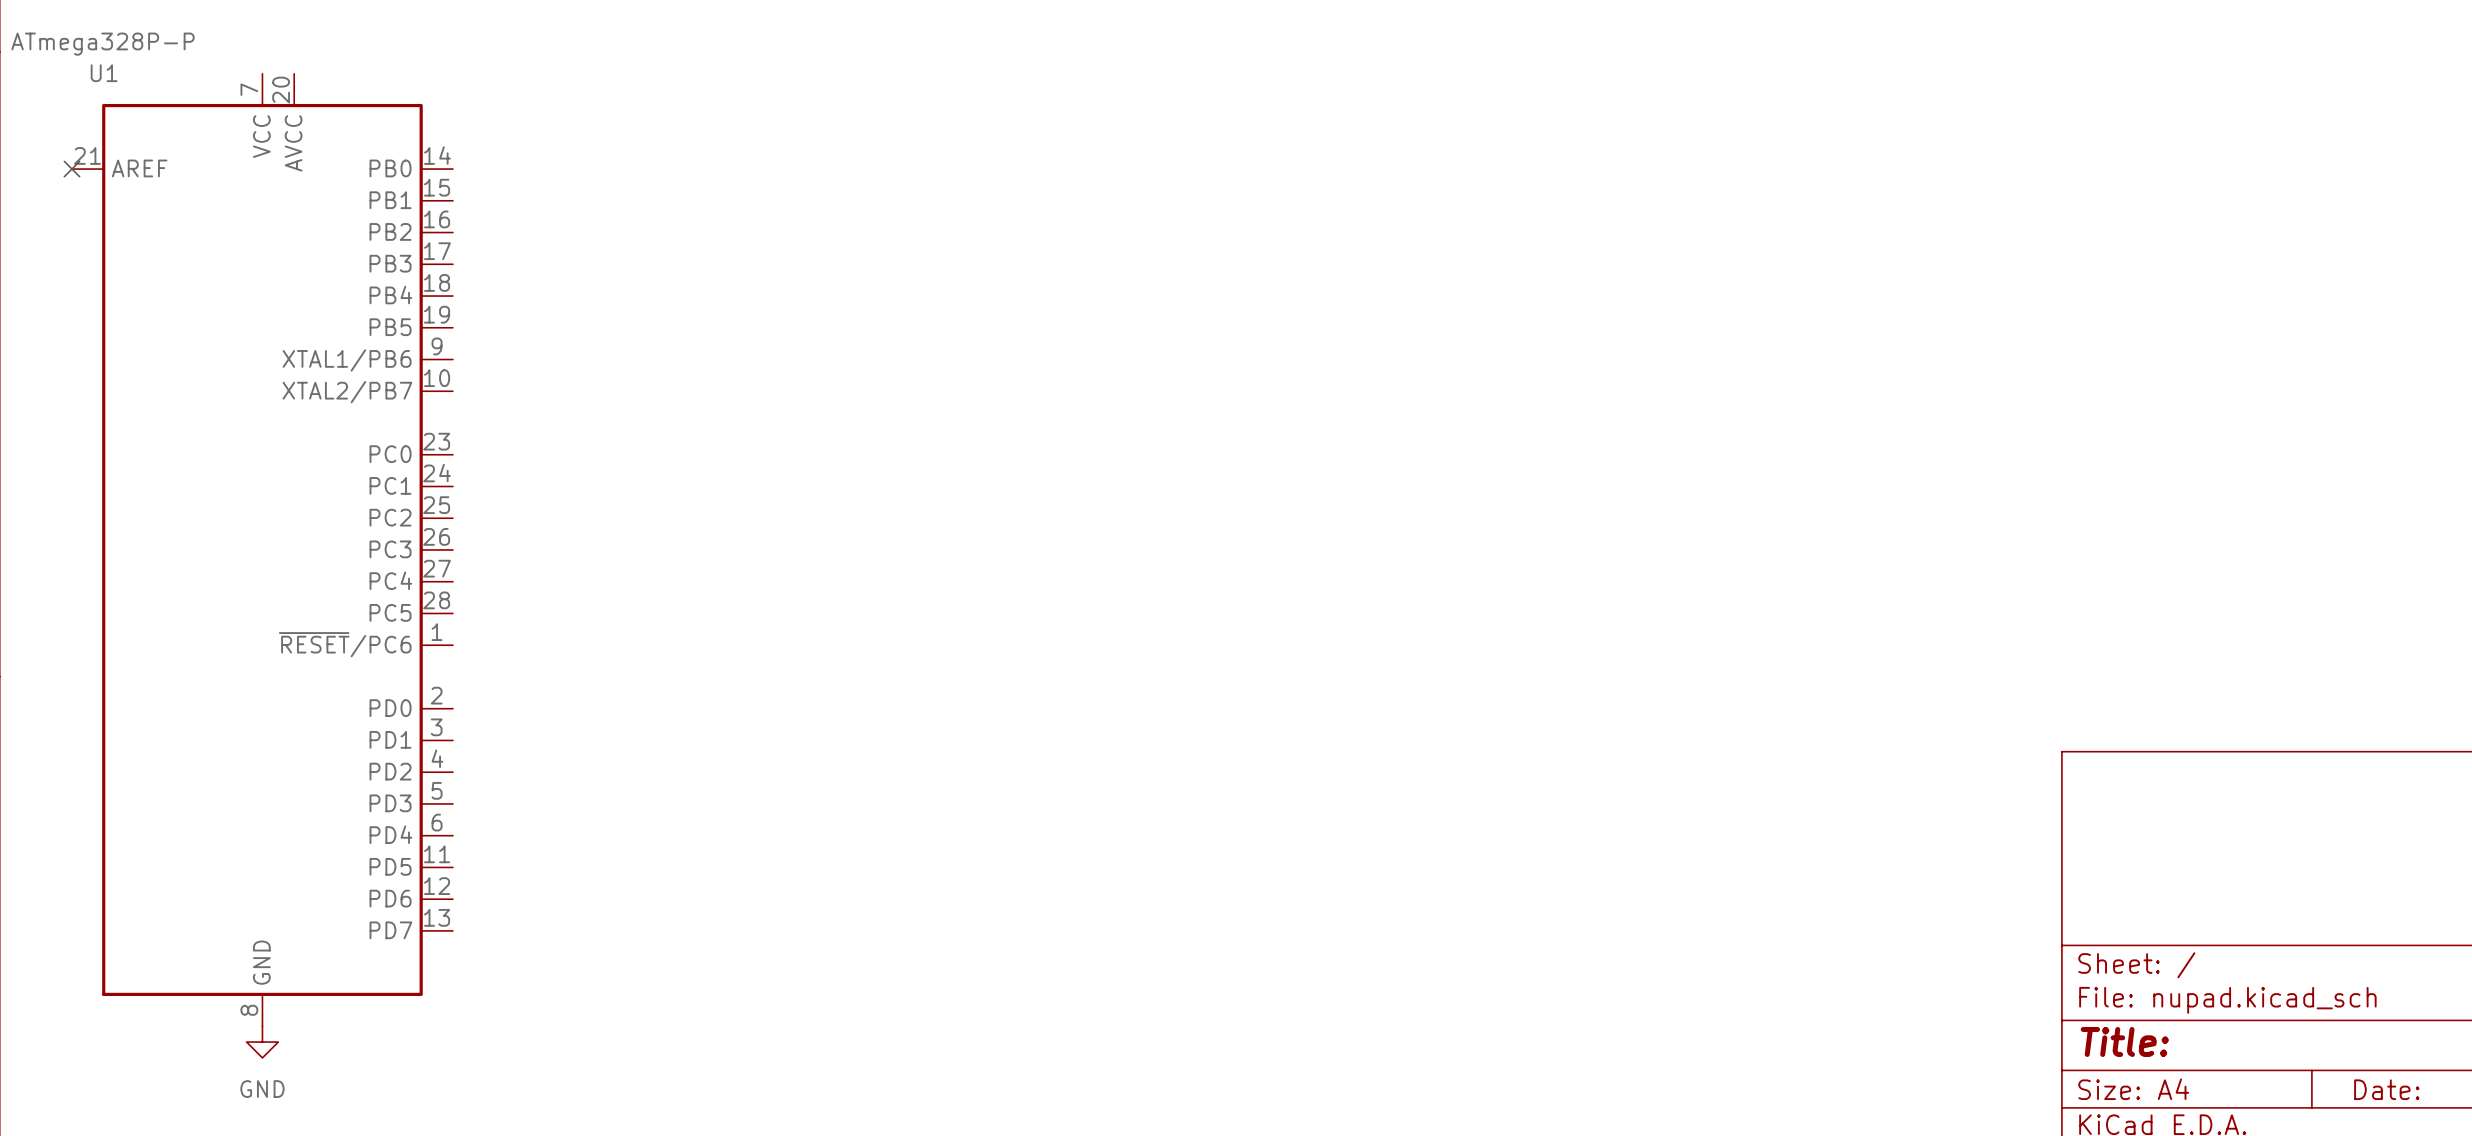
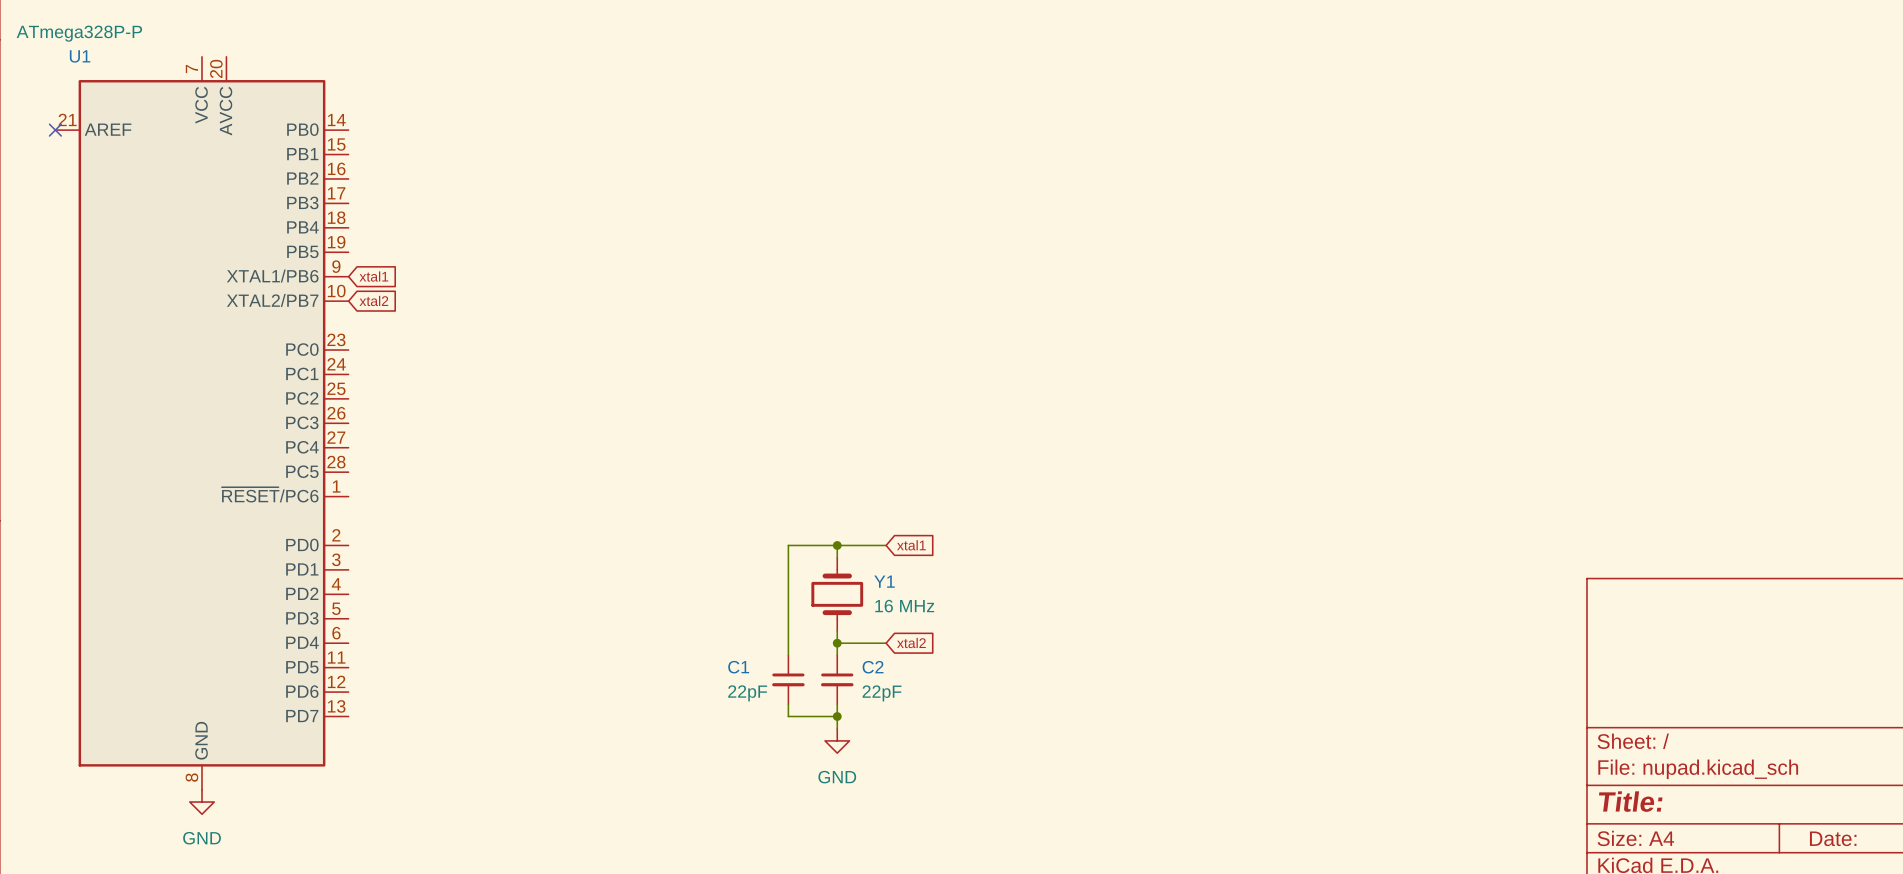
global label: none -> xtal1 (373, 276)
global label: none -> xtal2 (373, 300)
wire: none -> (837, 545) (837, 557)
junction: none -> (837, 545)
wire: none -> (886, 545) (788, 545) (788, 655)
global label: none -> xtal1 (911, 545)
Y1: none -> 16 MHz (837, 594)
wire: none -> (837, 630) (837, 655)
wire: none -> (837, 643) (886, 643)
junction: none -> (837, 643)
global label: none -> xtal2 (911, 643)
C1: none -> 22pF (788, 679)
C2: none -> 22pF (837, 679)
wire: none -> (788, 704) (788, 716) (837, 716)
wire: none -> (837, 704) (837, 728)
junction: none -> (837, 716)
power symbol: none -> GND (837, 740)

